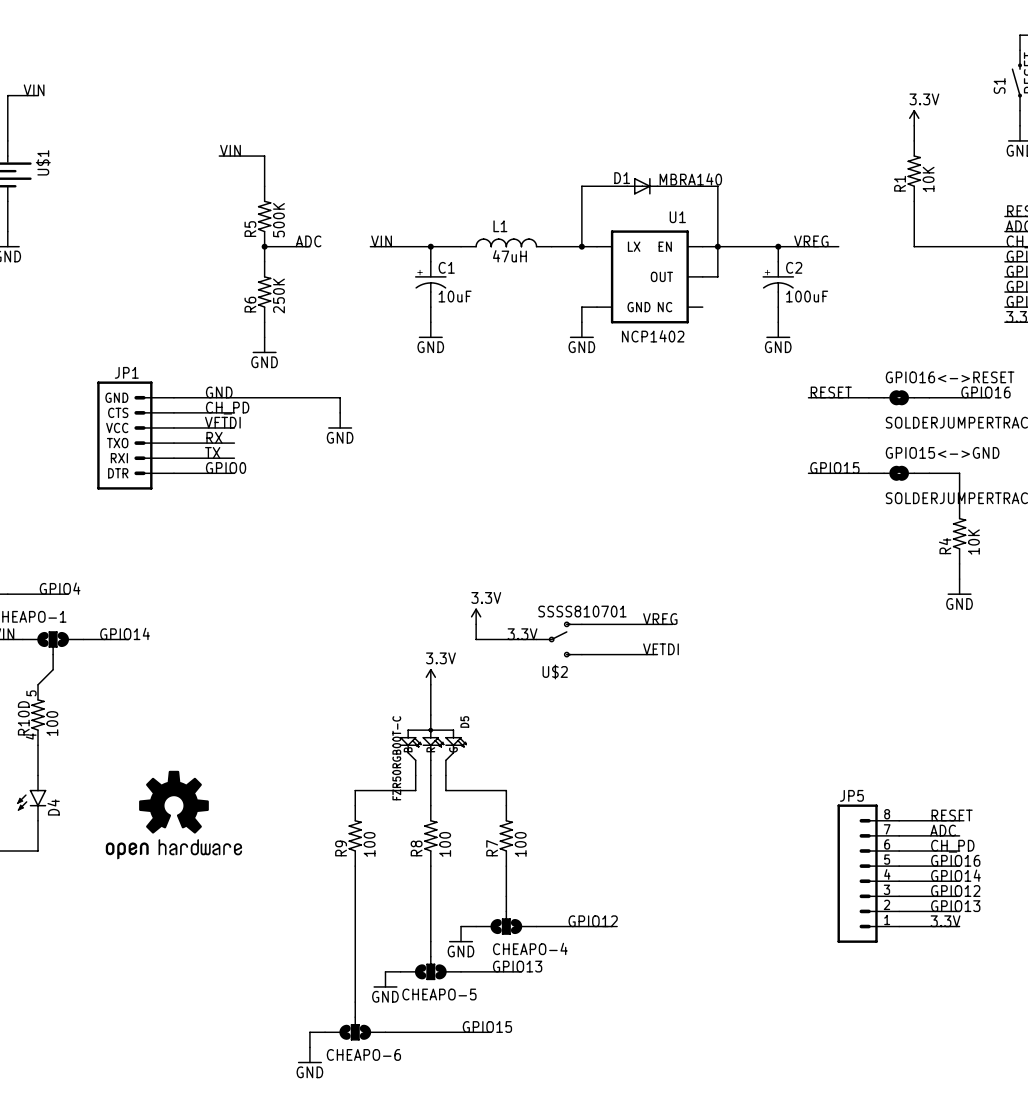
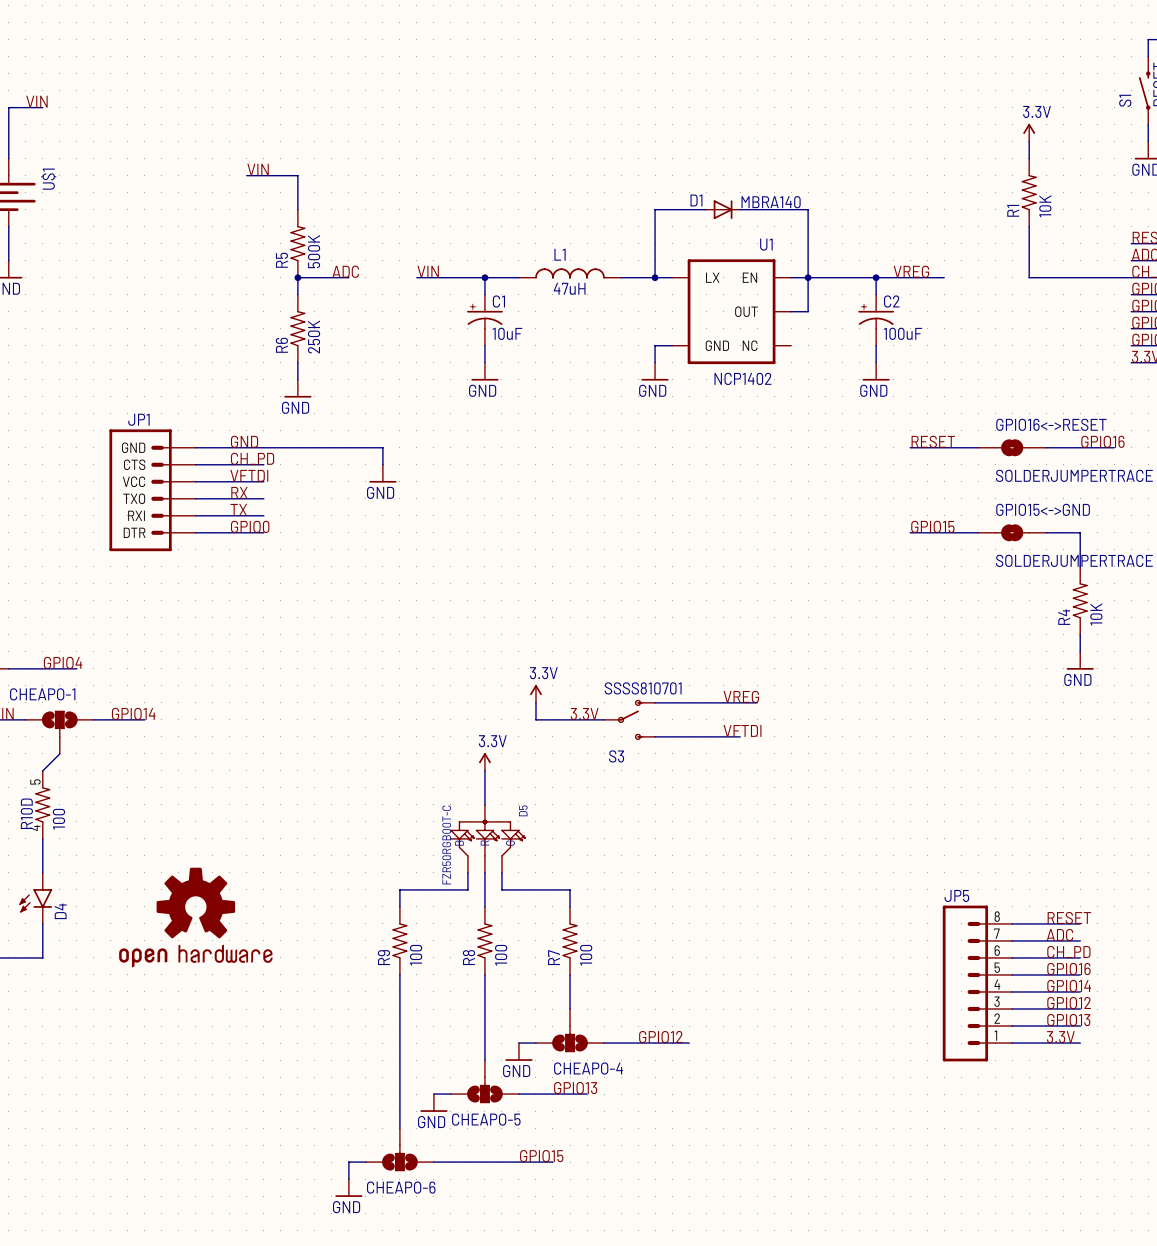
U$2 name: U$2 (555, 671) -> S3 (616, 756)

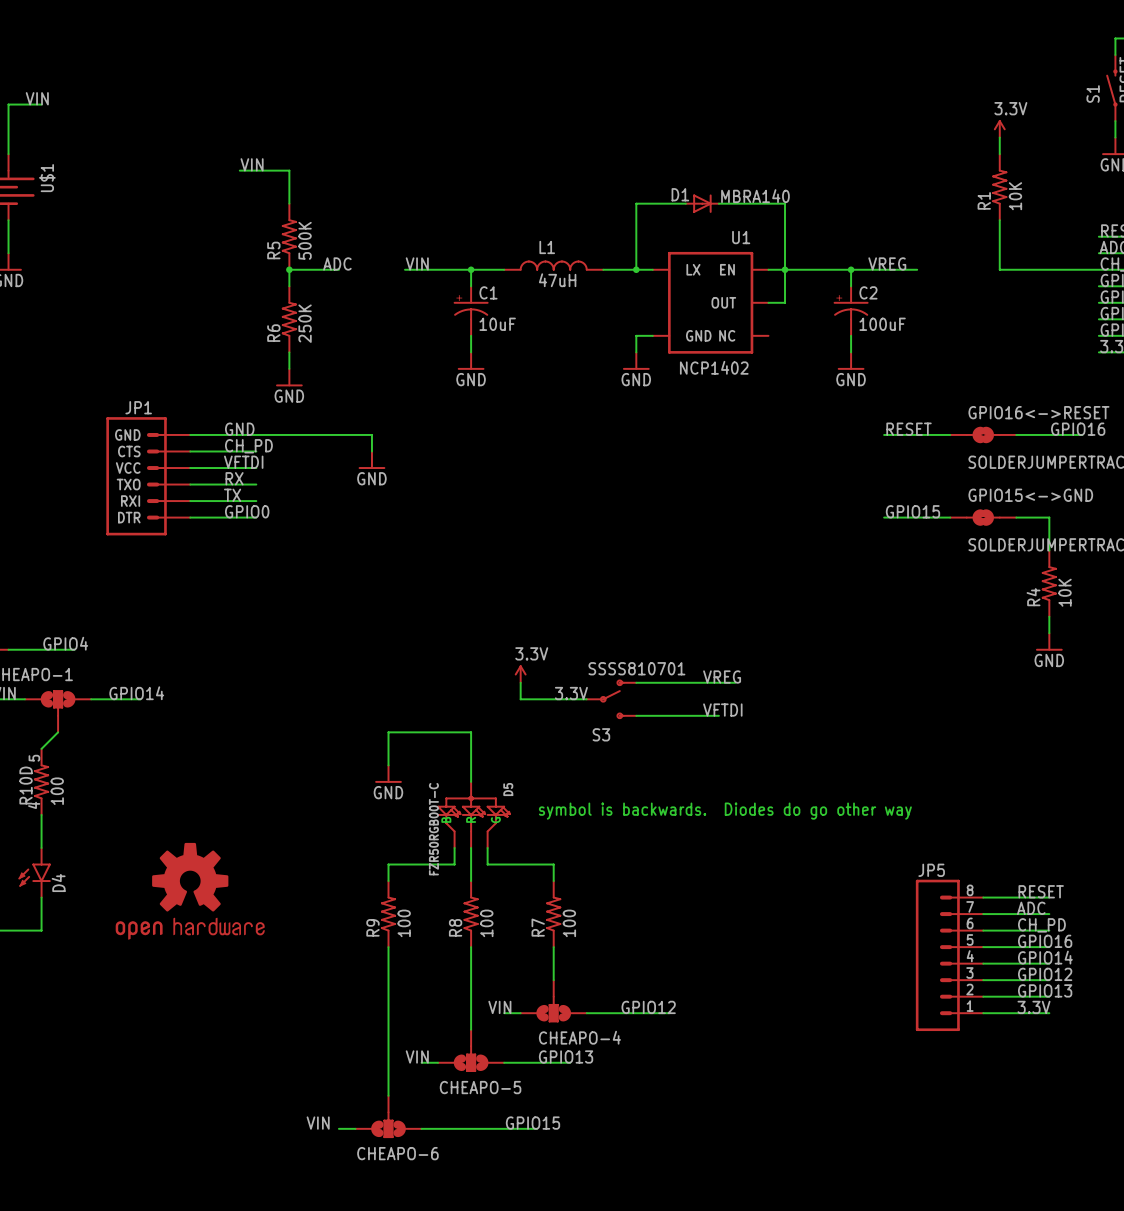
power symbol: 3.3V (484, 761) -> none
wire: none -> (471, 748) (471, 732) (388, 732) (388, 765)
power symbol: none -> GND (388, 774)
text: none -> symbol is backwards. Diodes do go other way (725, 811)
label: none -> VIN (499, 1007)
power symbol: GND (518, 1051) -> none
label: none -> VIN (417, 1056)
power symbol: GND (433, 1102) -> none
label: none -> VIN (318, 1123)
wire: (348, 1162) (348, 1179) -> none
power symbol: GND (348, 1188) -> none

